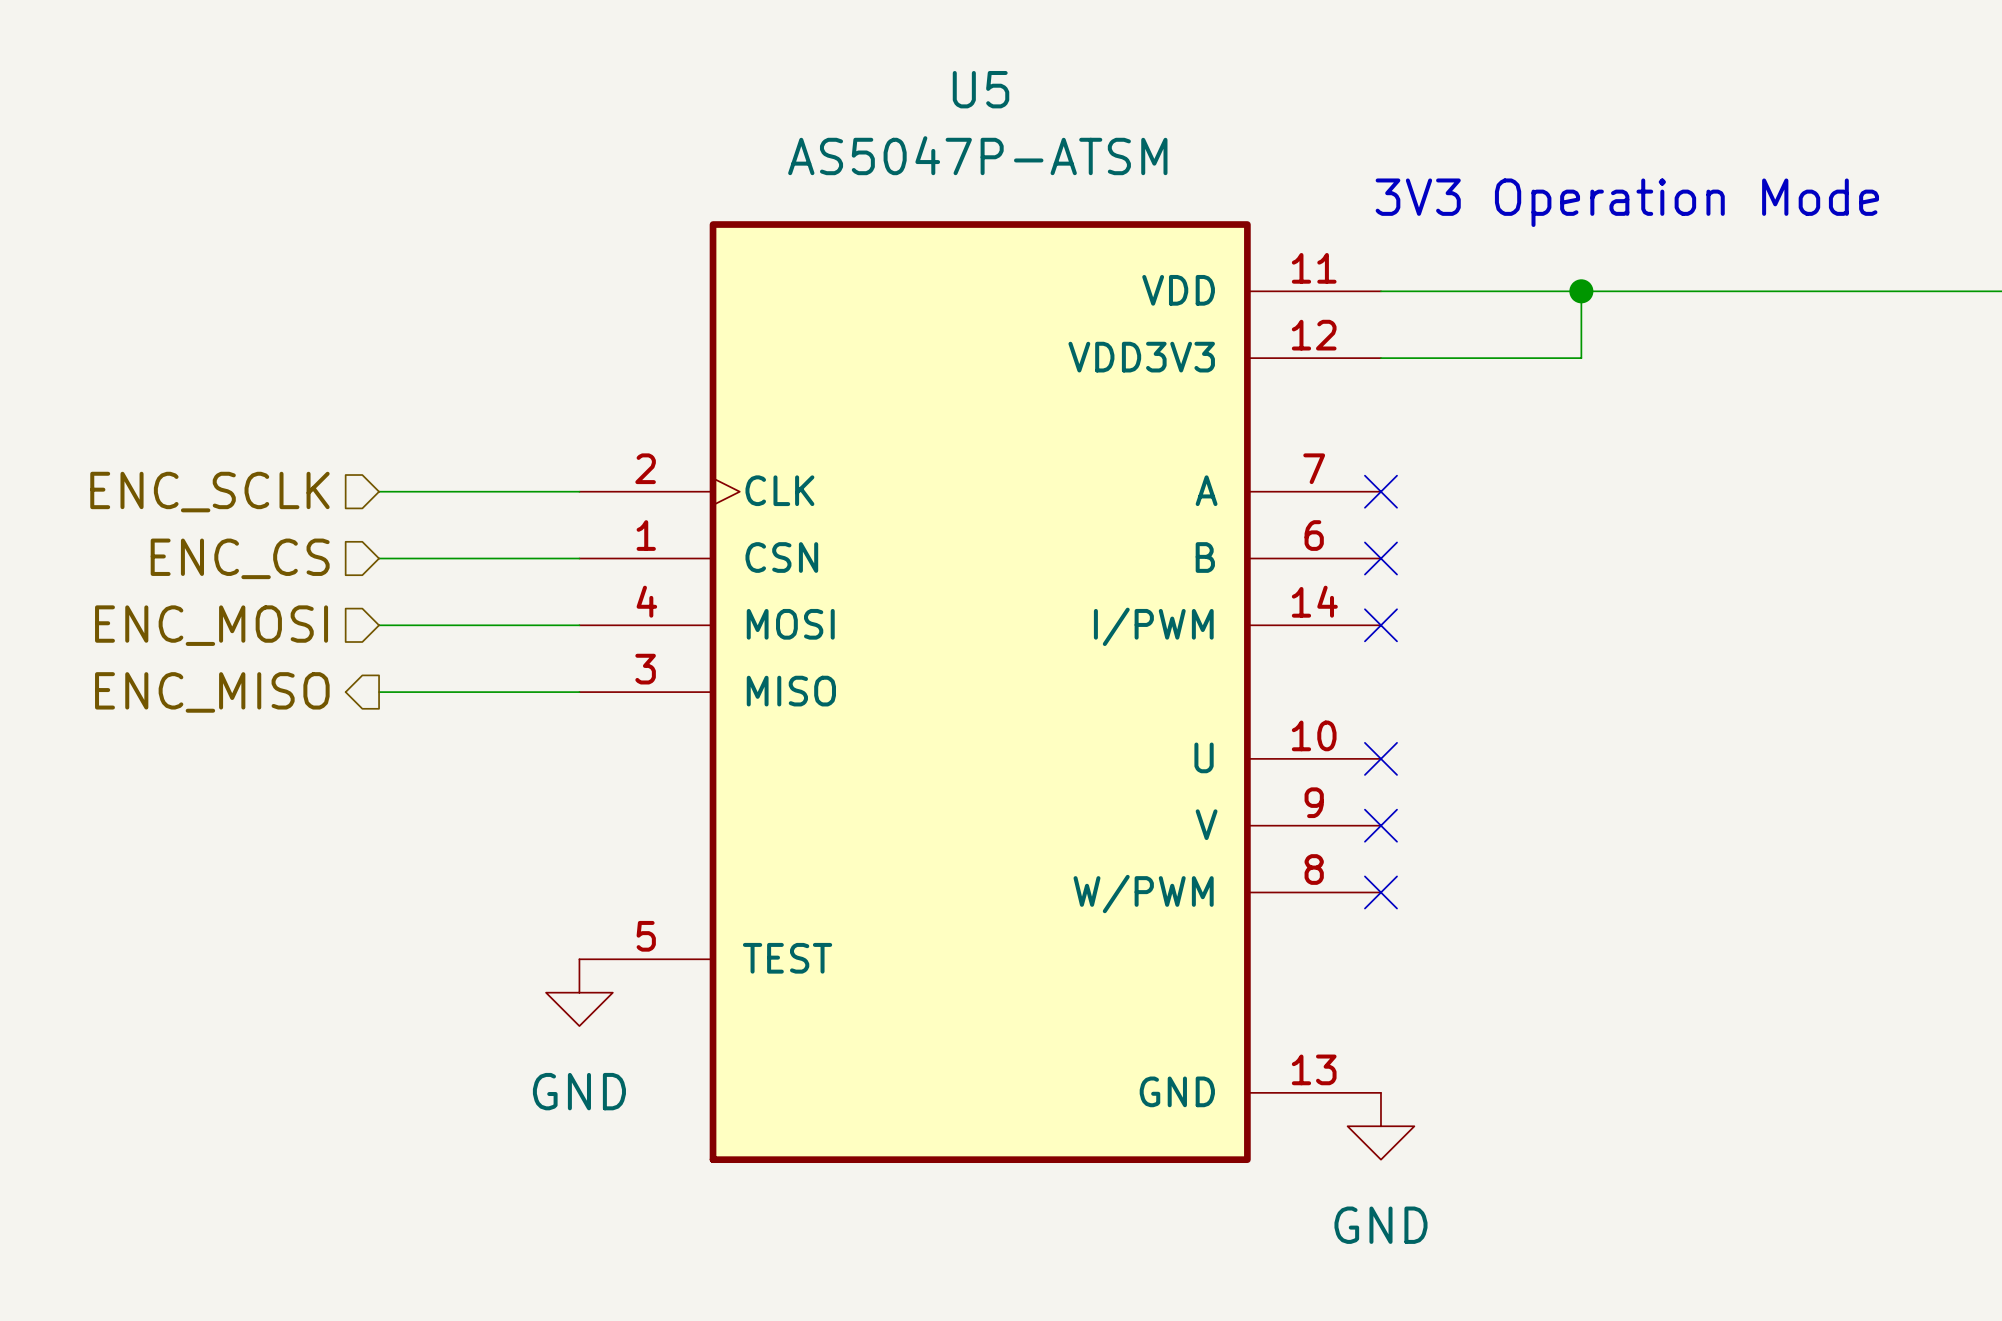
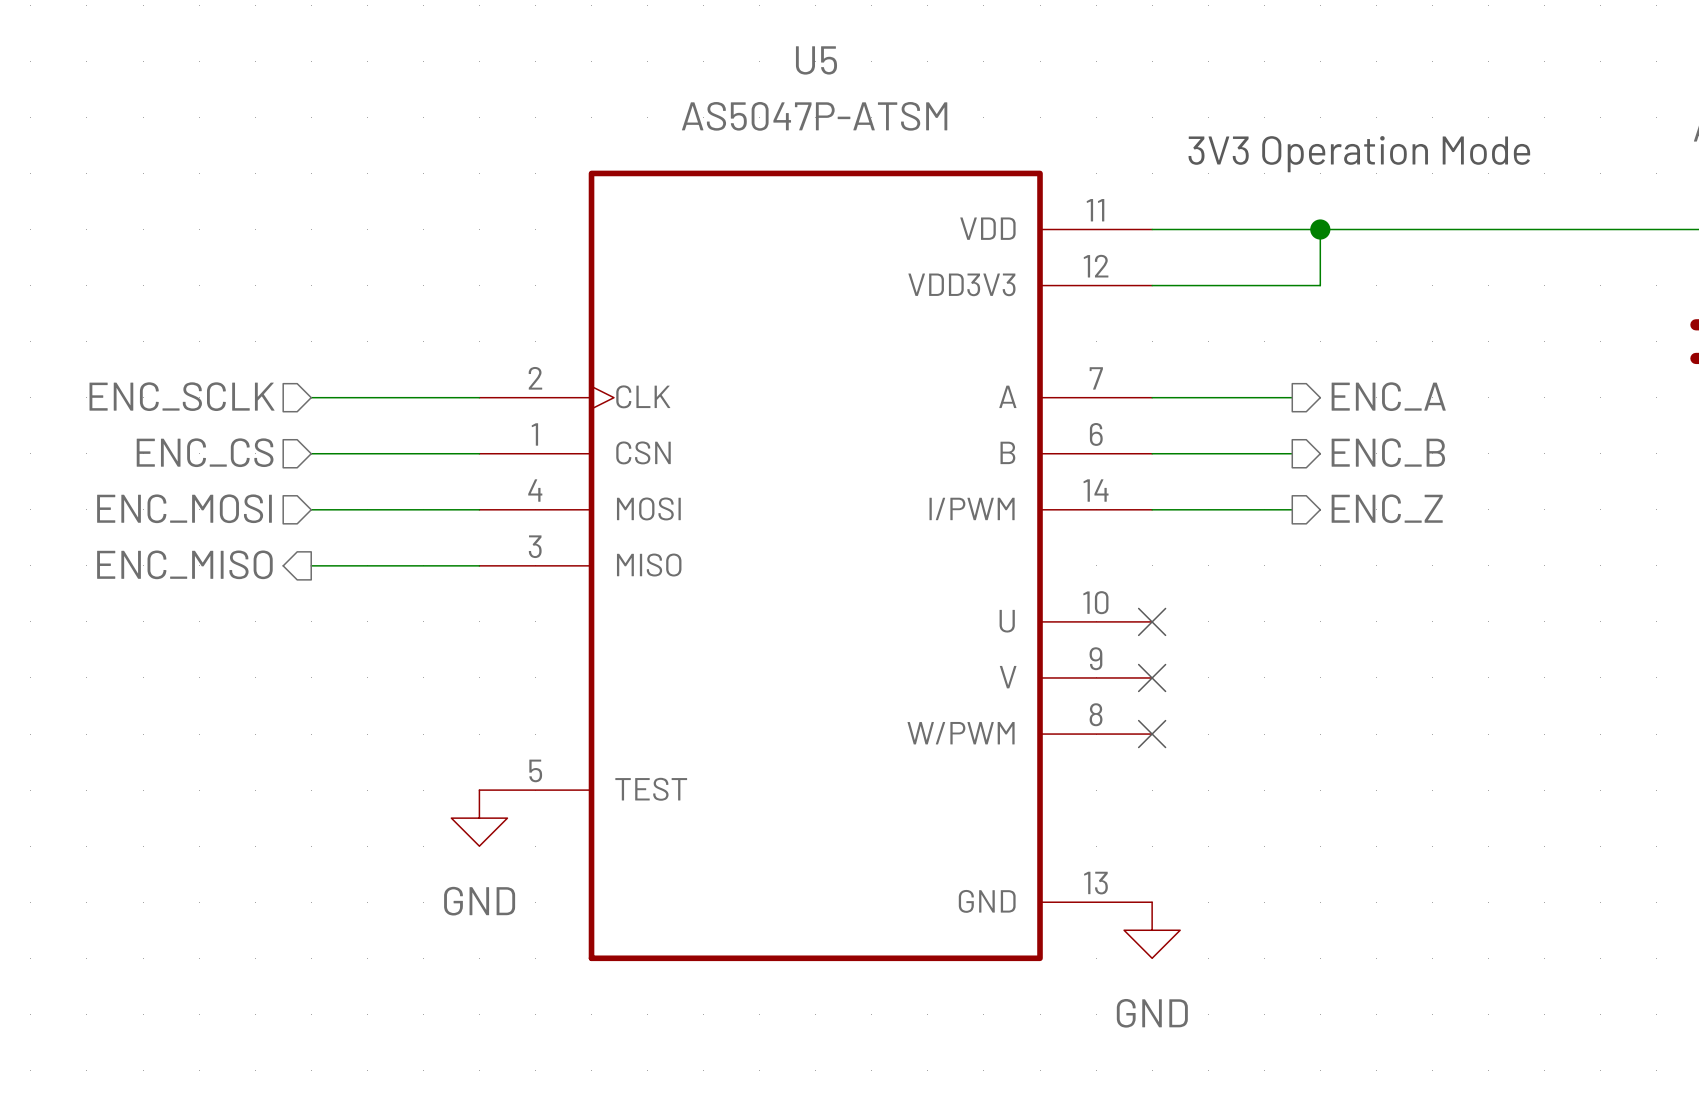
wire: none -> (1152, 397) (1292, 397)
no-connect mark: (1380, 491) -> none
hierarchical label: none -> ENC_A (1388, 396)
wire: none -> (1152, 453) (1292, 453)
no-connect mark: (1380, 558) -> none
hierarchical label: none -> ENC_B (1388, 452)
wire: none -> (1152, 509) (1292, 509)
no-connect mark: (1380, 625) -> none
hierarchical label: none -> ENC_Z (1387, 508)

